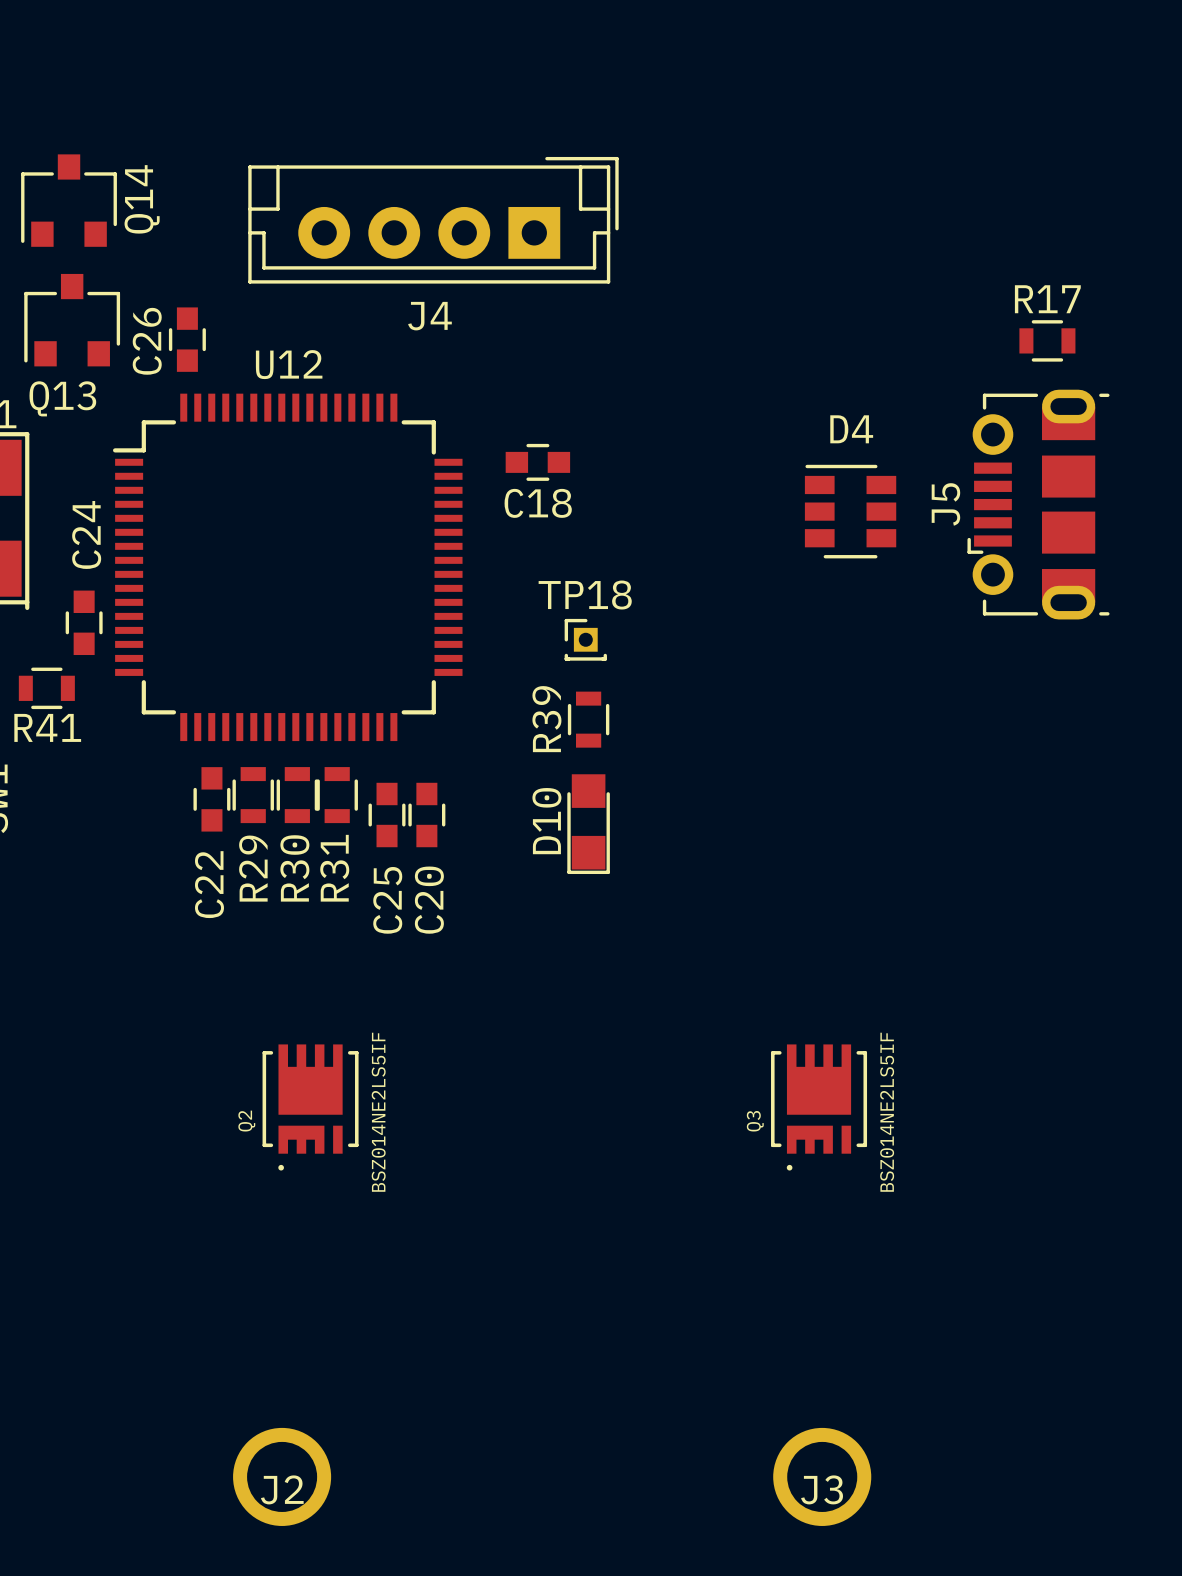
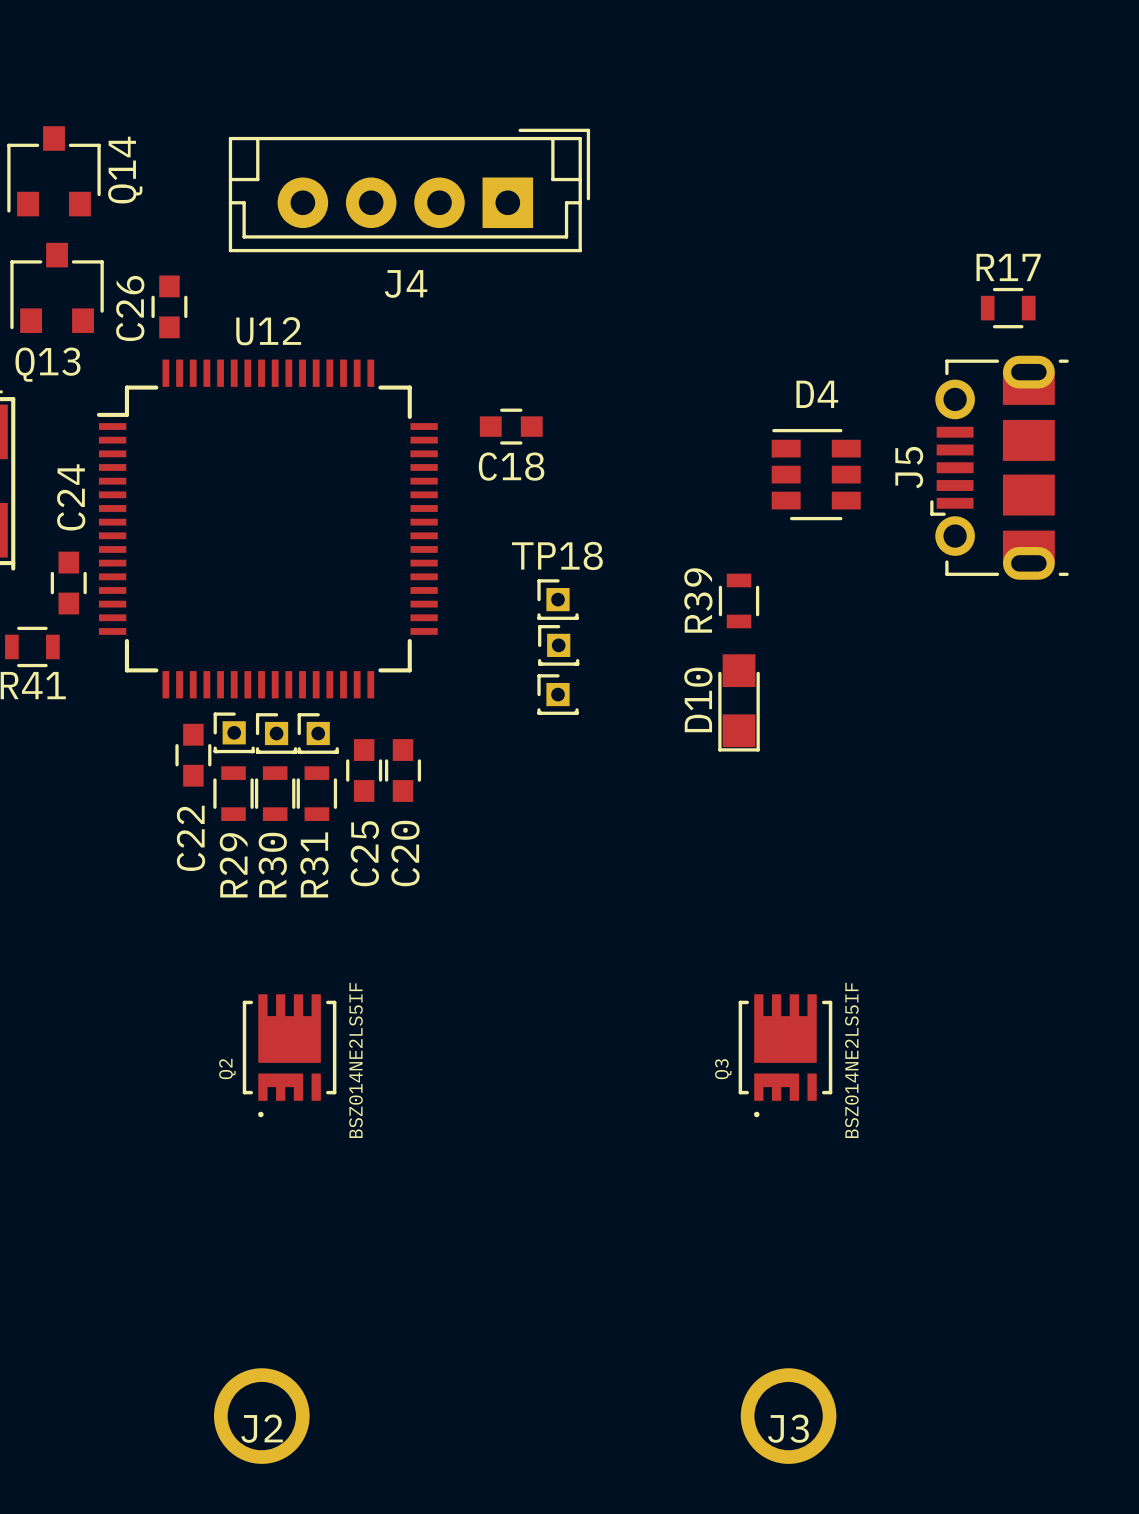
part: none -> (558, 645)
R39 position: (588, 719) -> (739, 600)
part: none -> (558, 694)
part: none -> (234, 732)
part: none -> (276, 733)
part: none -> (318, 733)
R29 position: (253, 795) -> (233, 793)
R30 position: (297, 795) -> (275, 793)
R31 position: (337, 795) -> (316, 793)
D10 position: (588, 824) -> (739, 702)

